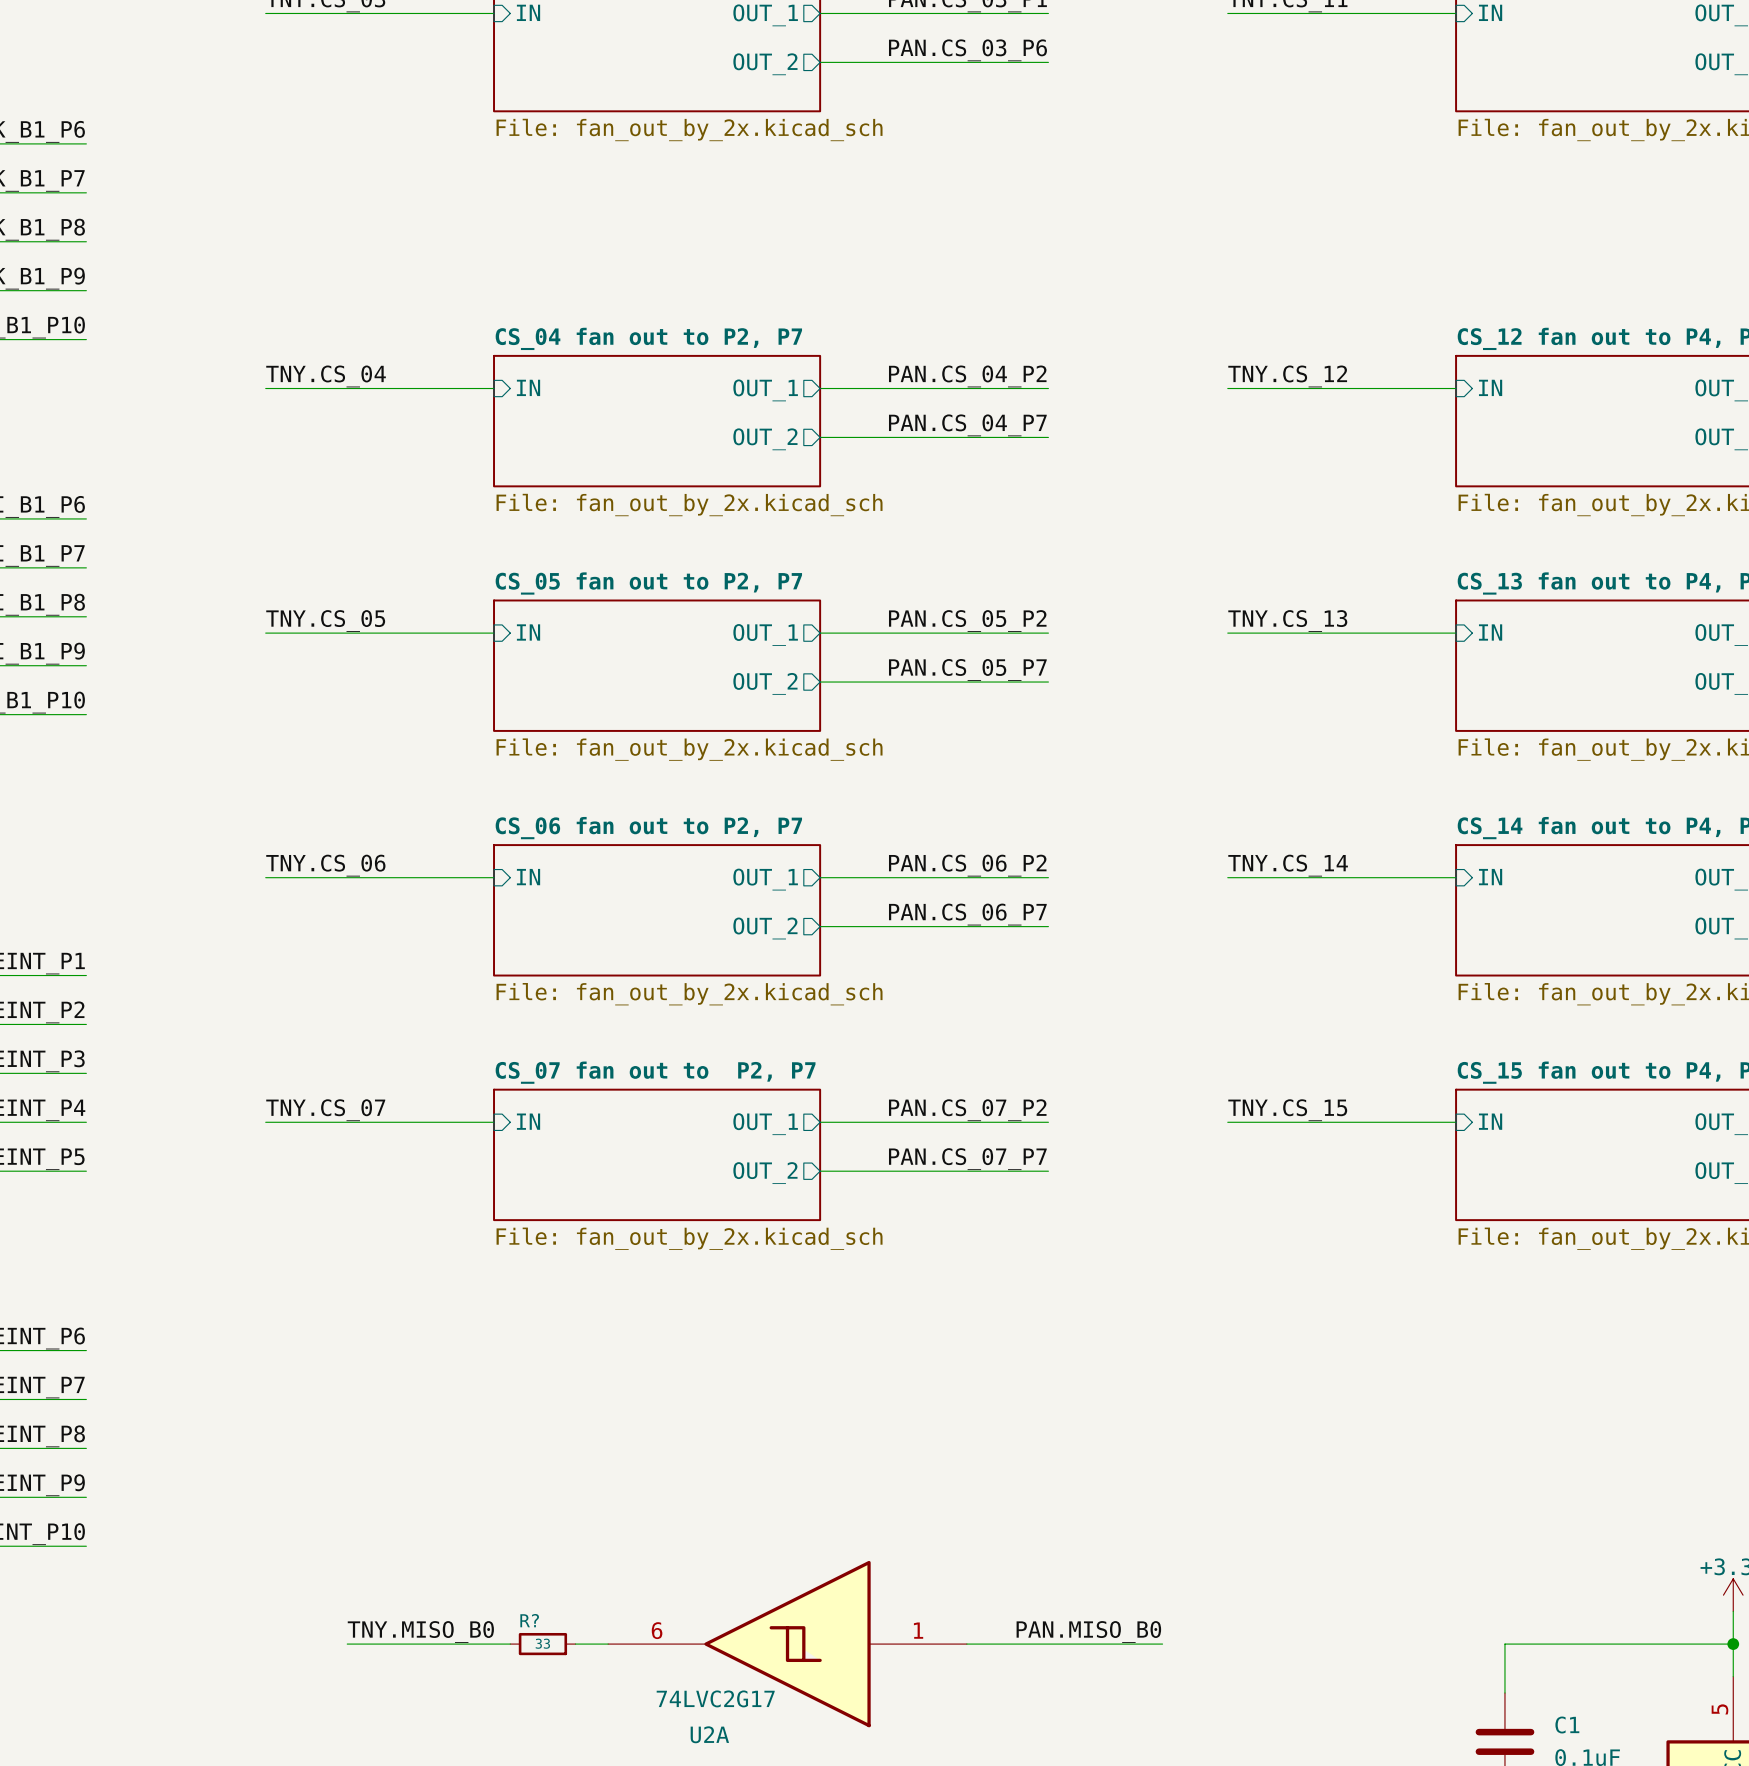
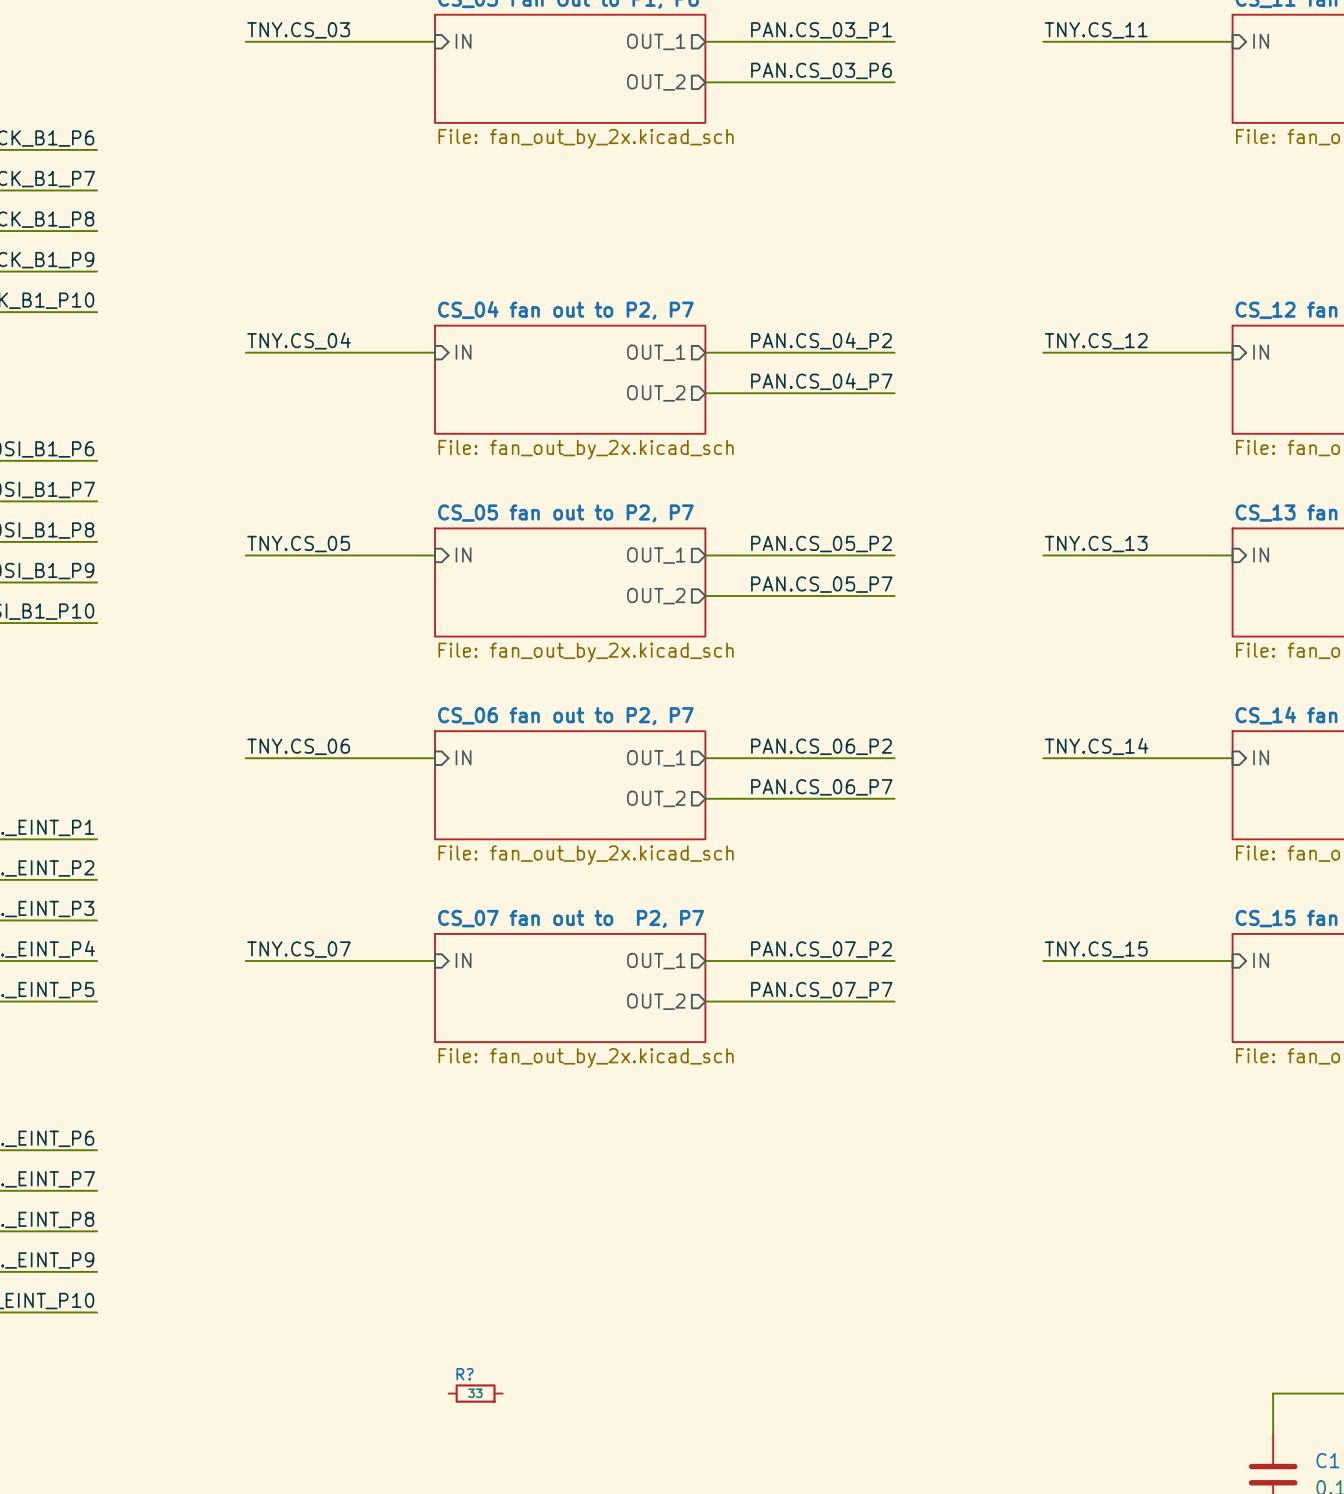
label: TNY.MISO_B0 (420, 1632) -> none
label: PAN.MISO_B0 (1088, 1632) -> none
wire: (347, 1644) (510, 1644) -> none
wire: (575, 1644) (608, 1644) -> none
U2A: 74LVC2G17 (787, 1644) -> none
wire: (966, 1644) (1162, 1644) -> none

